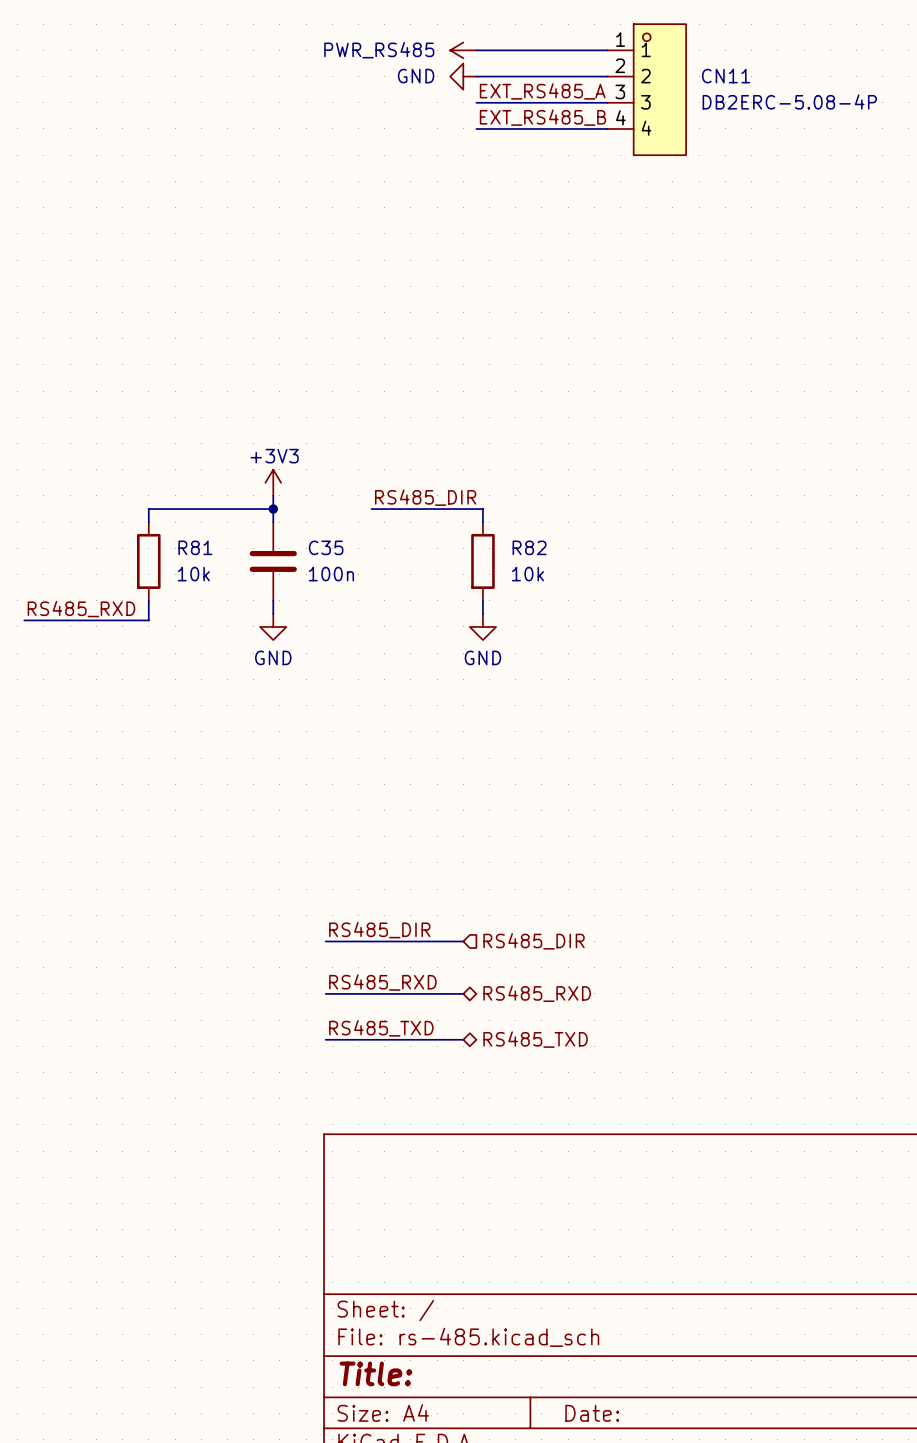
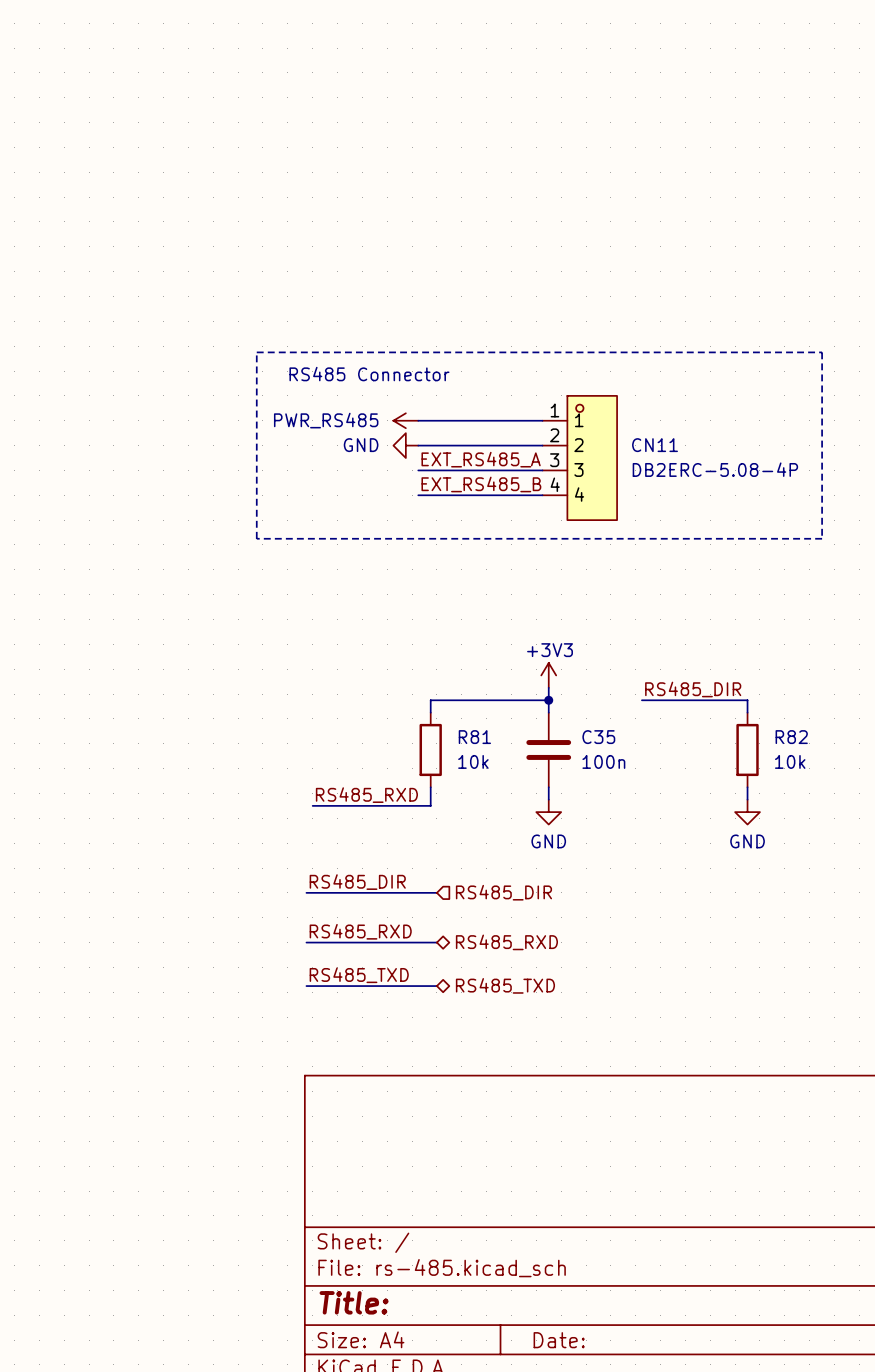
power symbol: PWR_RS485 (463, 50) -> none
wire: (476, 50) (607, 50) -> none
power symbol: GND (463, 76) -> none
wire: (476, 76) (607, 76) -> none
CN11 position: (646, 89) -> (579, 458)
label: EXT_RS485_A (542, 91) -> none
wire: (476, 102) (607, 102) -> none
label: EXT_RS485_B (542, 117) -> none
wire: (476, 128) (607, 128) -> none
line: none -> (256, 352) (822, 352) (822, 538) (256, 538) (256, 352)
text: none -> RS485 Connector (369, 374)
power symbol: none -> PWR_RS485 (405, 420)
wire: none -> (418, 420) (542, 420)
power symbol: none -> GND (405, 445)
wire: none -> (418, 445) (542, 445)
power symbol: +3V3 (273, 482) -> none
label: none -> EXT_RS485_A (481, 459)
wire: none -> (418, 470) (542, 470)
label: RS485_DIR (425, 497) -> none
wire: (273, 509) (148, 509) (148, 522) -> none
junction: (273, 509) -> none
wire: (371, 509) (482, 509) (482, 522) -> none
label: none -> EXT_RS485_B (481, 484)
wire: none -> (418, 495) (542, 495)
R81 position: (148, 561) -> (430, 749)
C35 position: (273, 561) -> (548, 749)
R82 position: (482, 561) -> (747, 749)
wire: (148, 600) (148, 620) (24, 620) -> none
wire: (273, 600) (273, 613) -> none
wire: (482, 600) (482, 613) -> (548, 787) (548, 799)
label: RS485_RXD (81, 609) -> none
power symbol: GND (273, 626) -> none
power symbol: GND (482, 626) -> none
power symbol: none -> +3V3 (548, 675)
wire: none -> (548, 687) (548, 712)
label: none -> RS485_DIR (693, 689)
wire: none -> (548, 700) (430, 700) (430, 712)
junction: none -> (548, 700)
wire: none -> (641, 700) (747, 700) (747, 712)
wire: none -> (430, 787) (430, 805) (312, 805)
wire: none -> (747, 787) (747, 799)
label: none -> RS485_RXD (366, 795)
power symbol: none -> GND (548, 812)
power symbol: none -> GND (747, 812)

